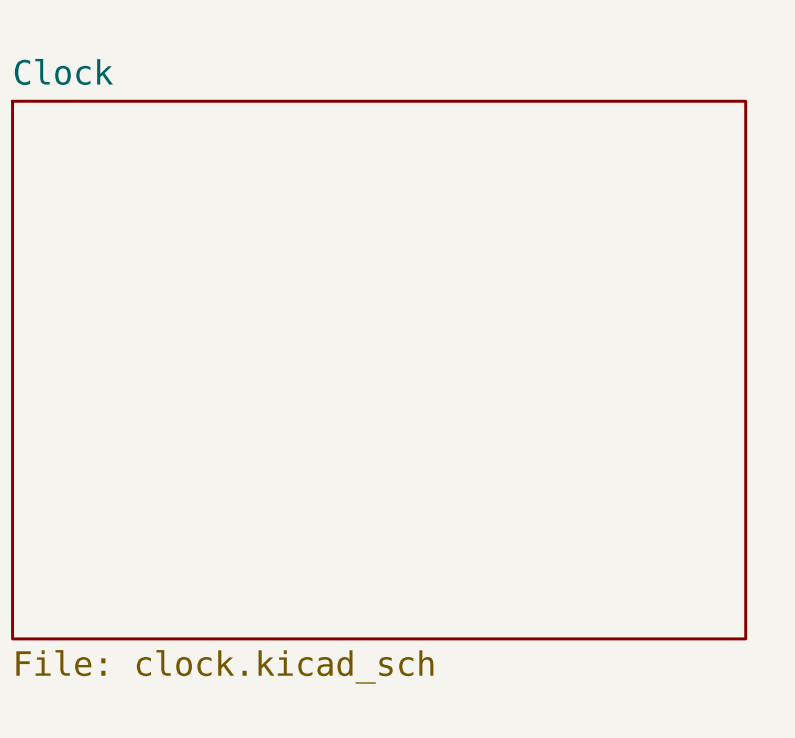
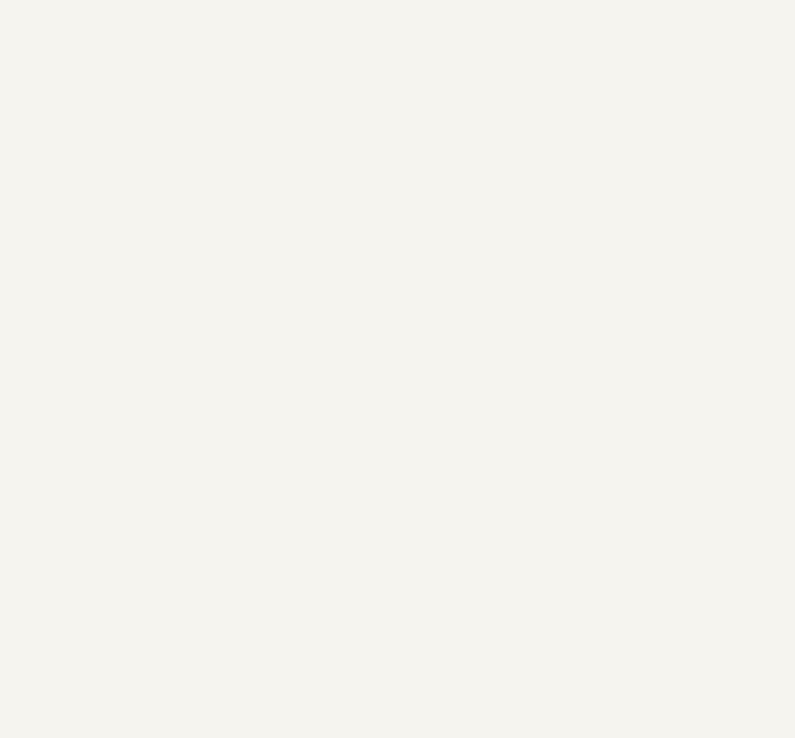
sheet Clock: File: clock.kicad_sch (379, 370) -> none

